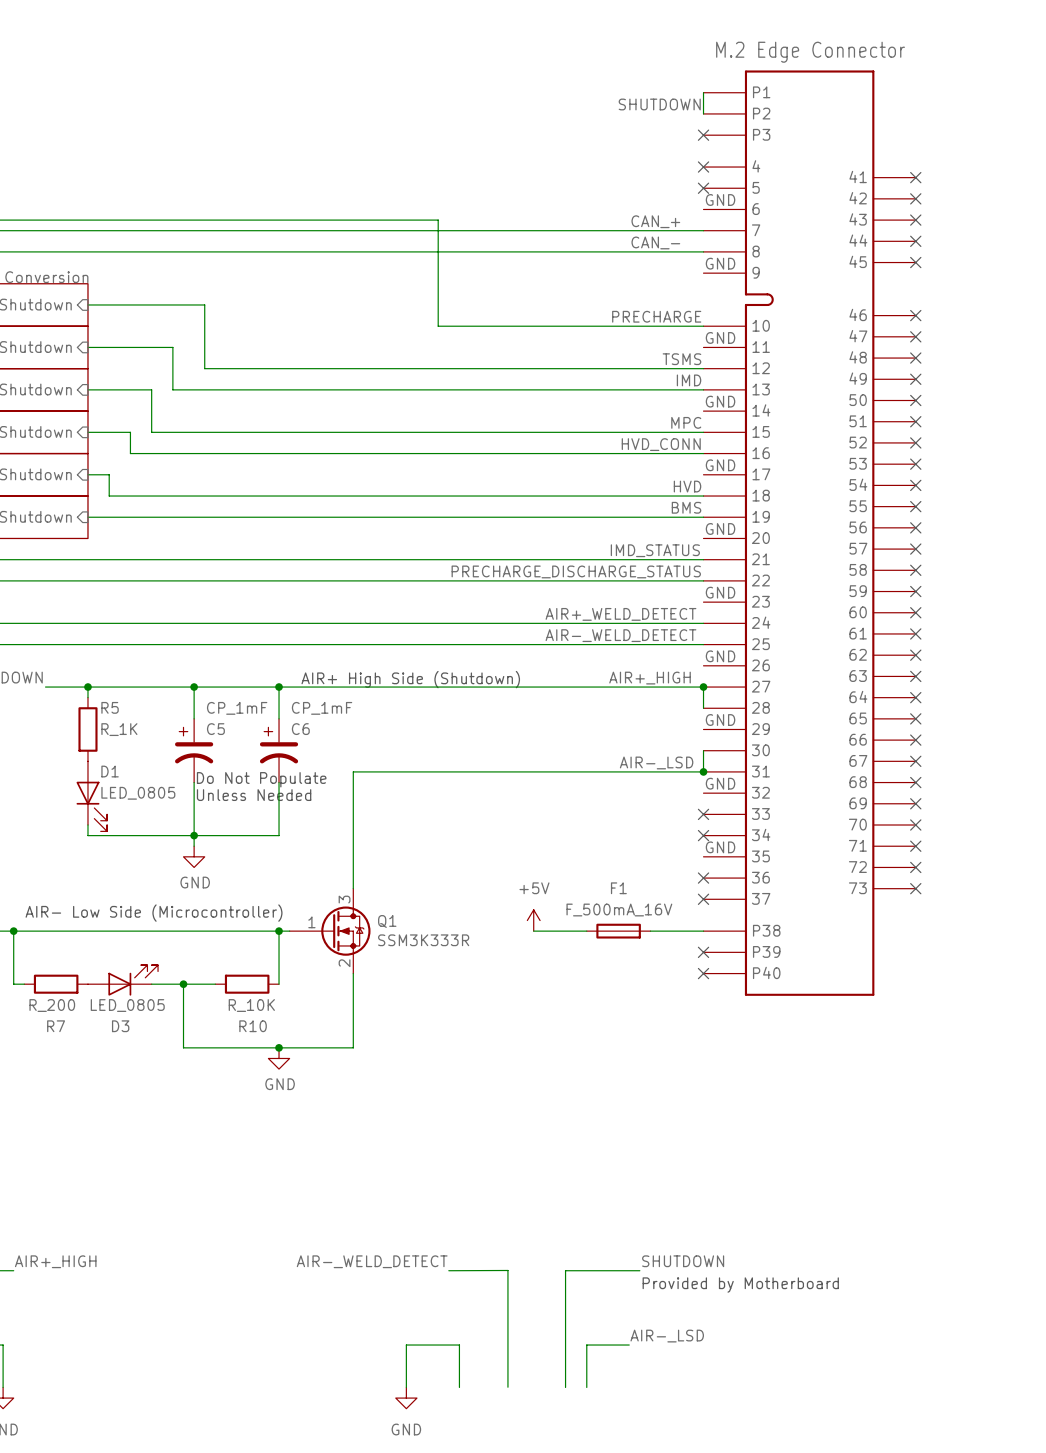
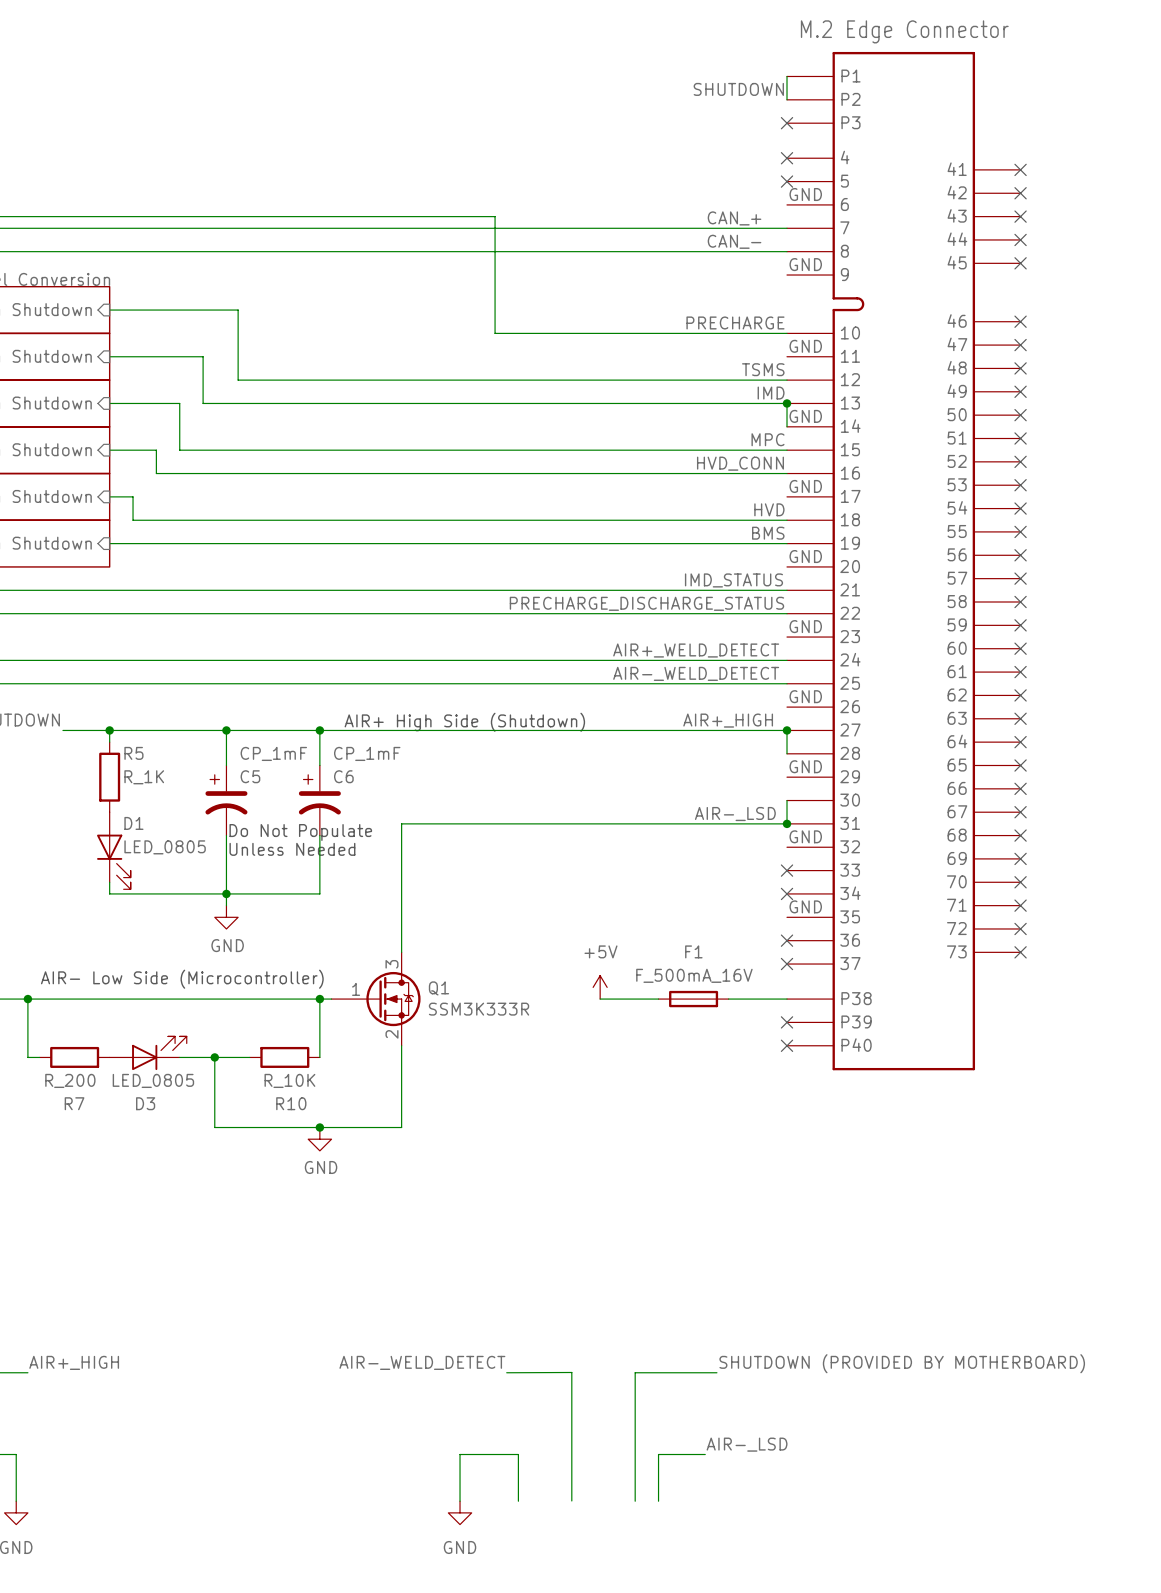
wire: none -> (787, 403) (787, 426)
junction: none -> (787, 403)
label: SHUTDOWN (683, 1261) -> SHUTDOWN (PROVIDED BY MOTHERBOARD) (902, 1363)
text: Provided by Motherboard (740, 1285) -> none

